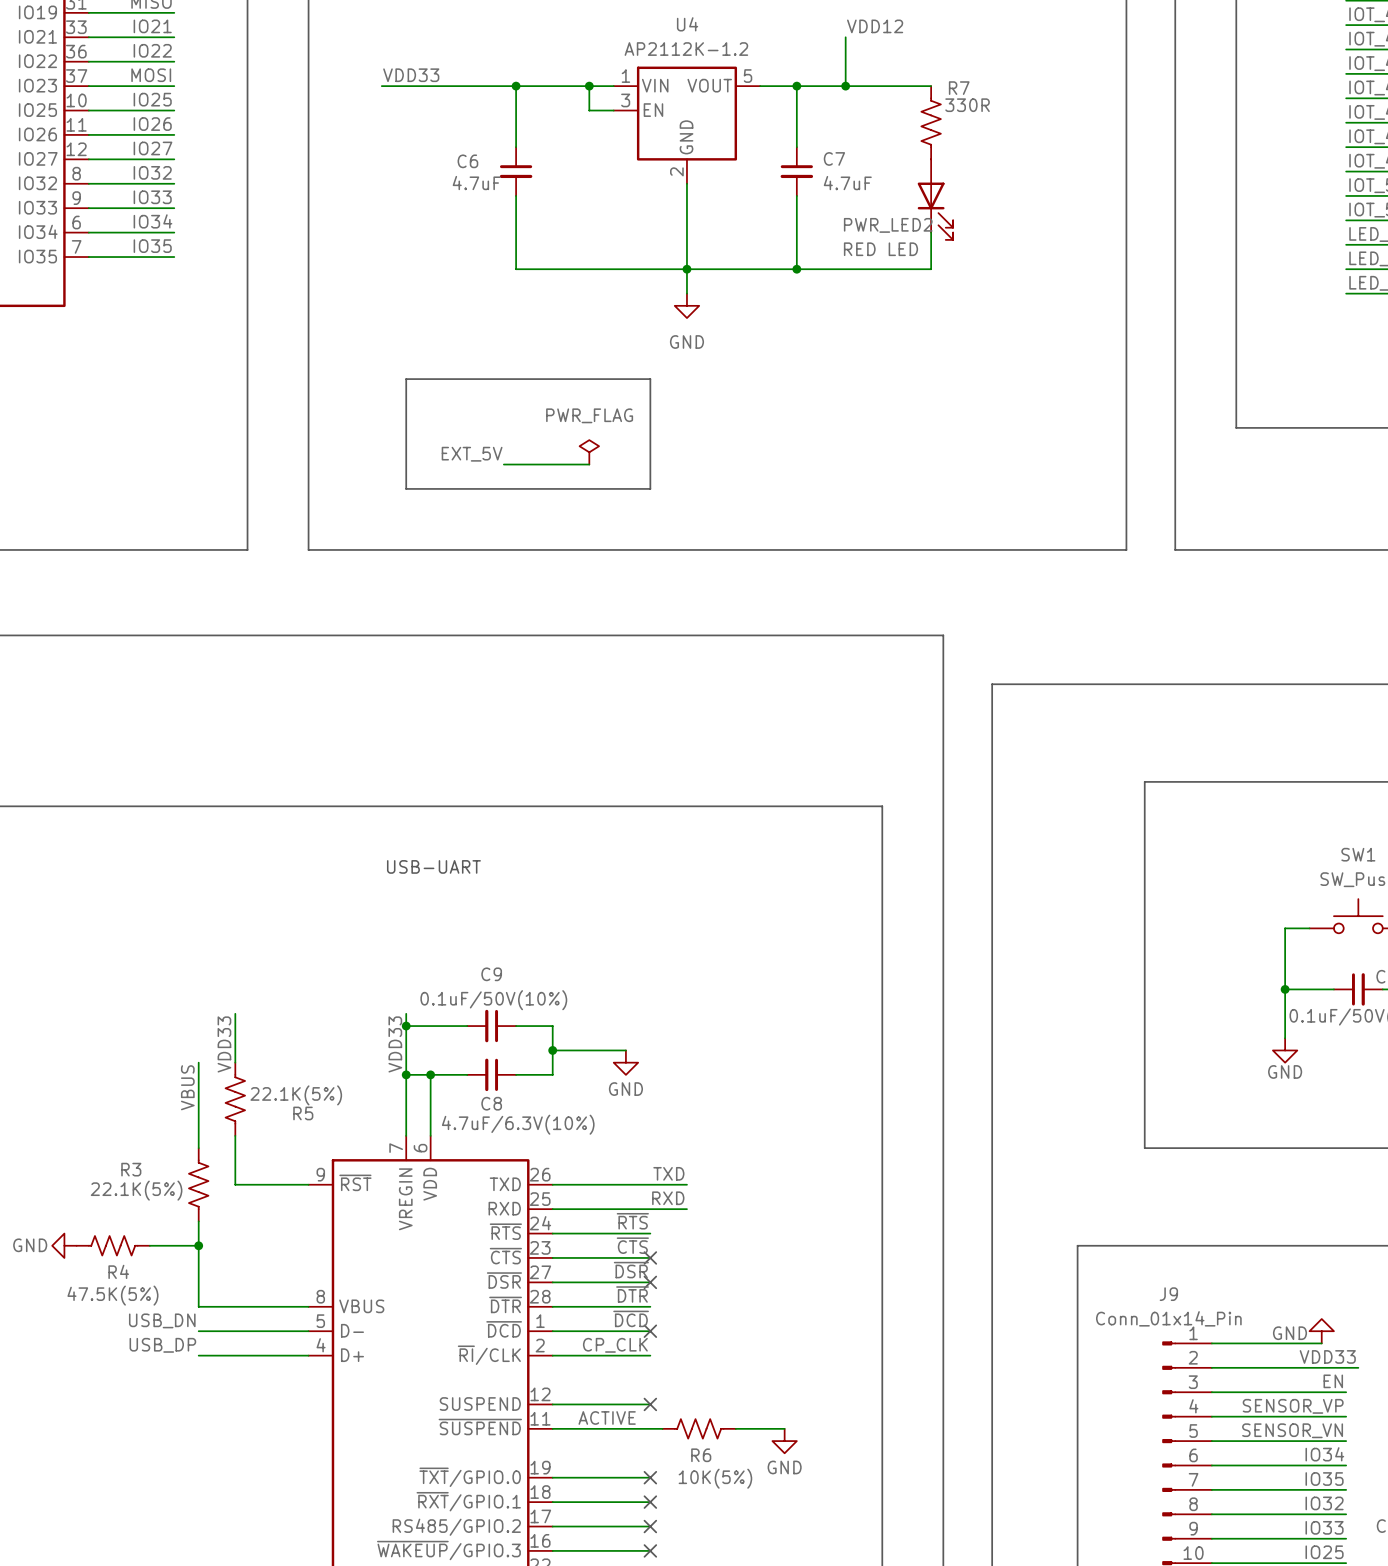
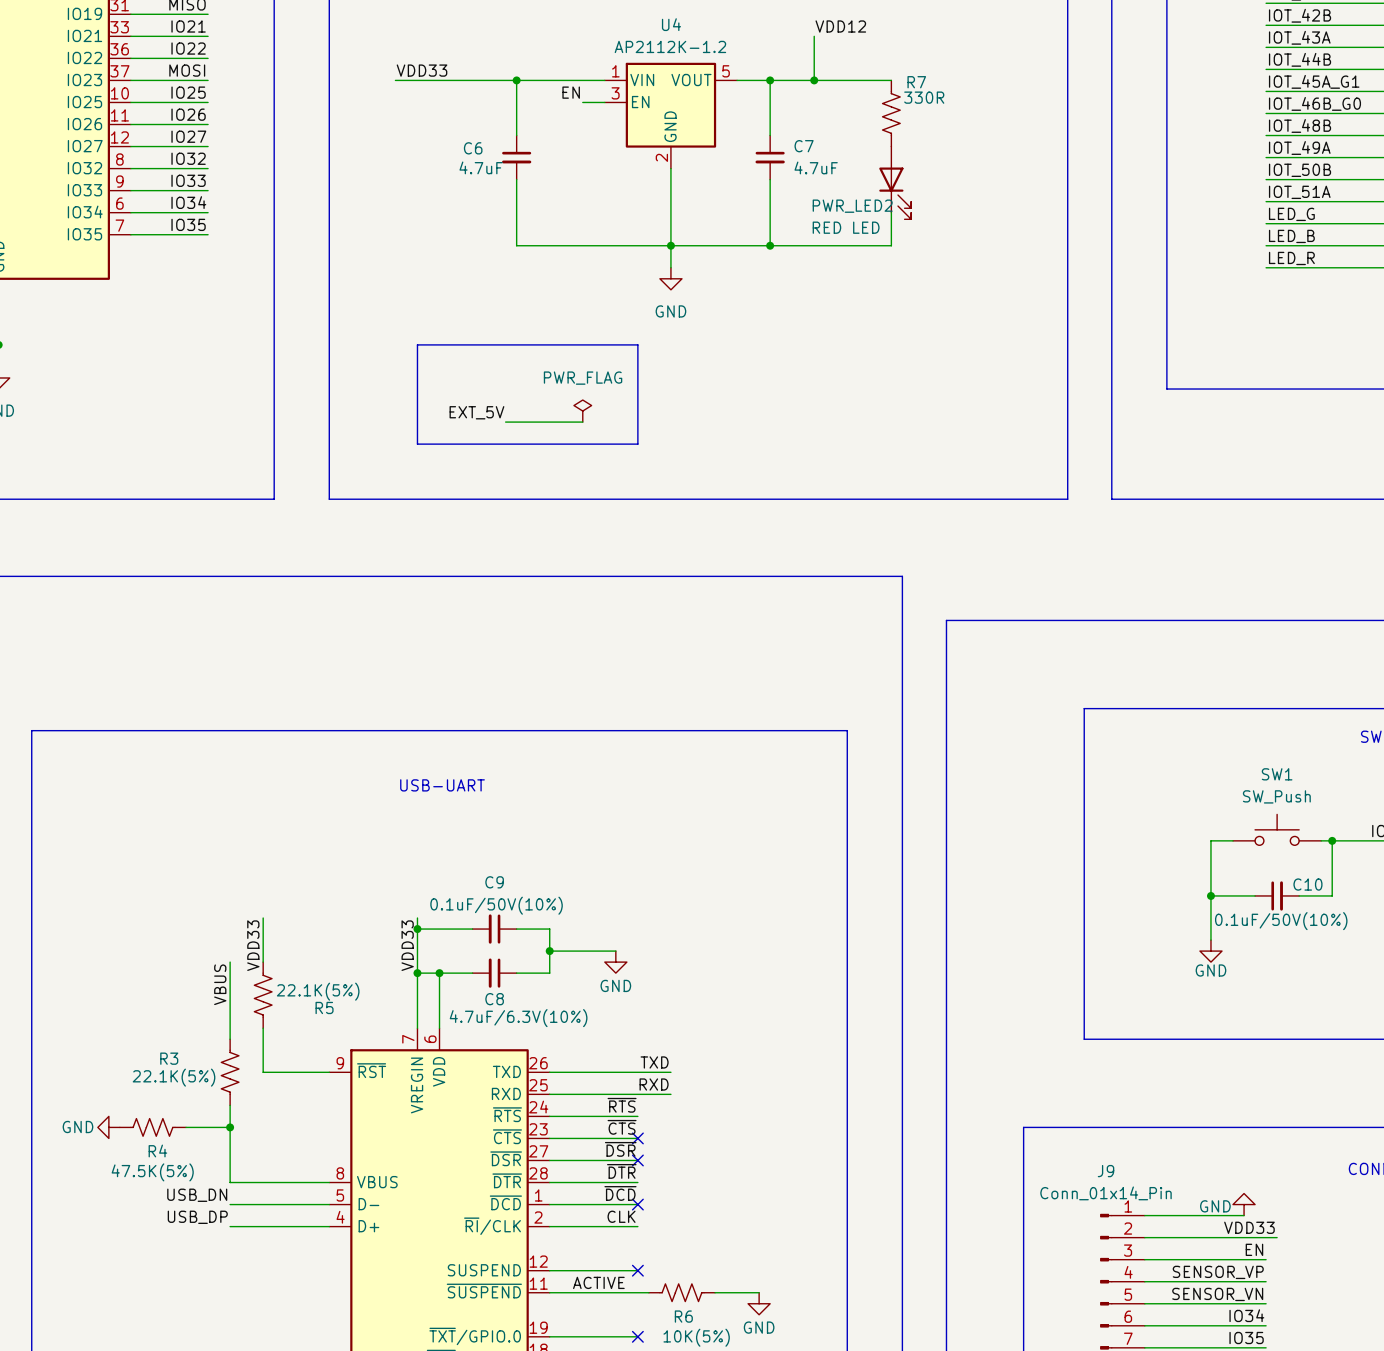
wire: (589, 86) (589, 110) -> none
junction: (589, 86) -> none
label: none -> EN (571, 92)
label: CP_CLK (615, 1345) -> CLK (621, 1216)

